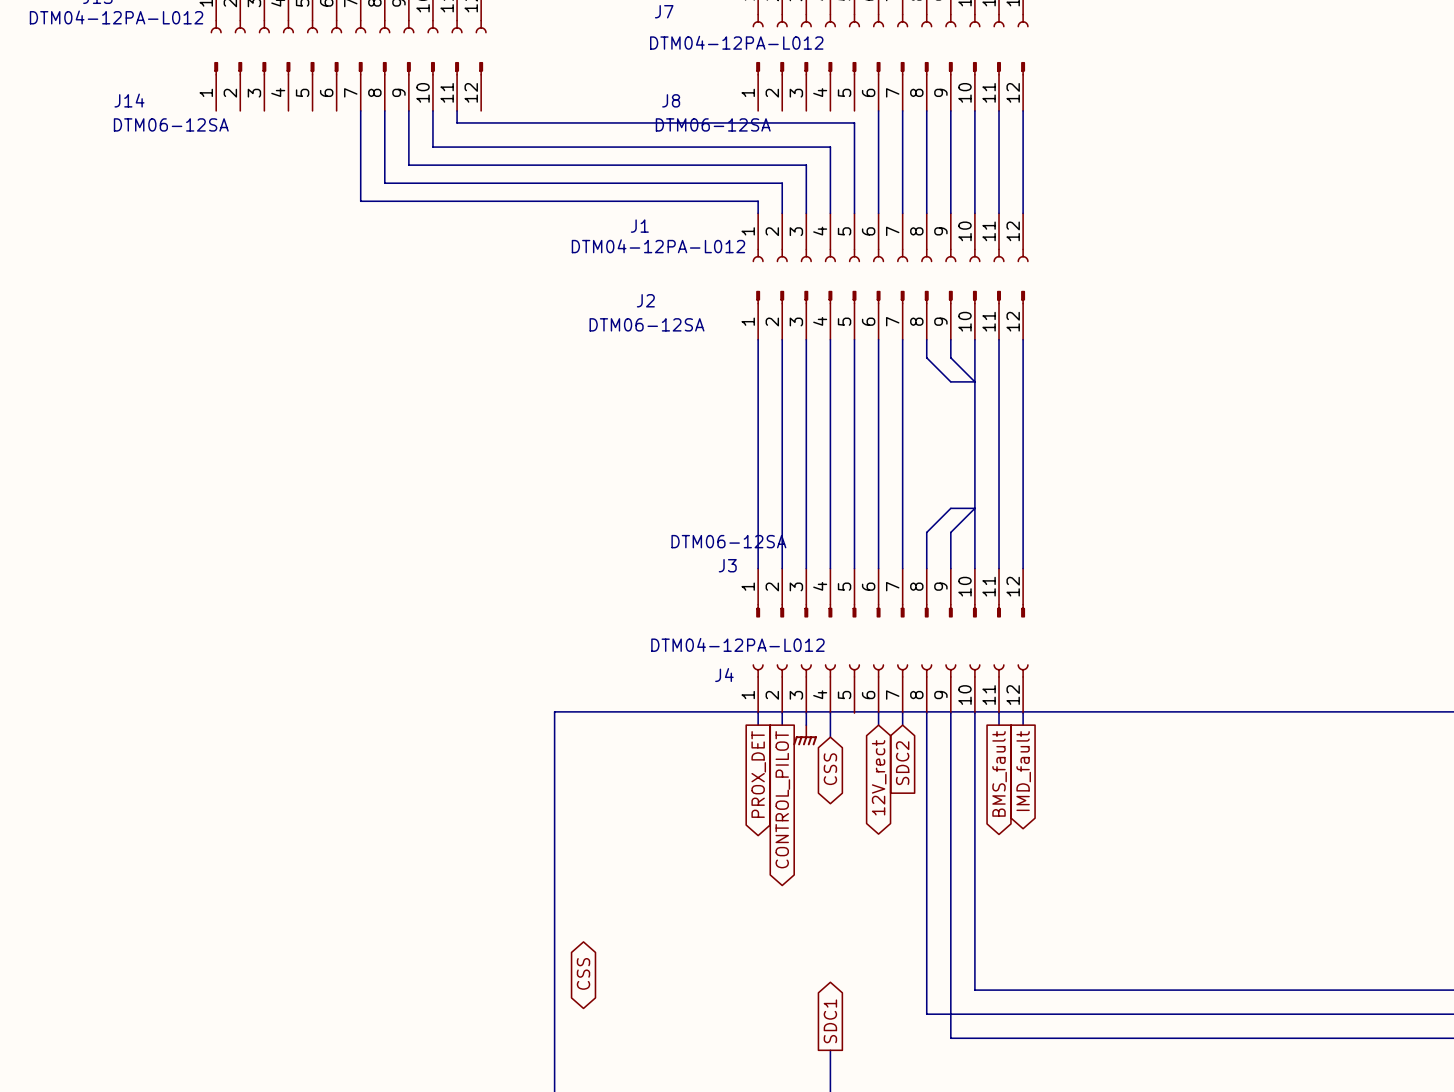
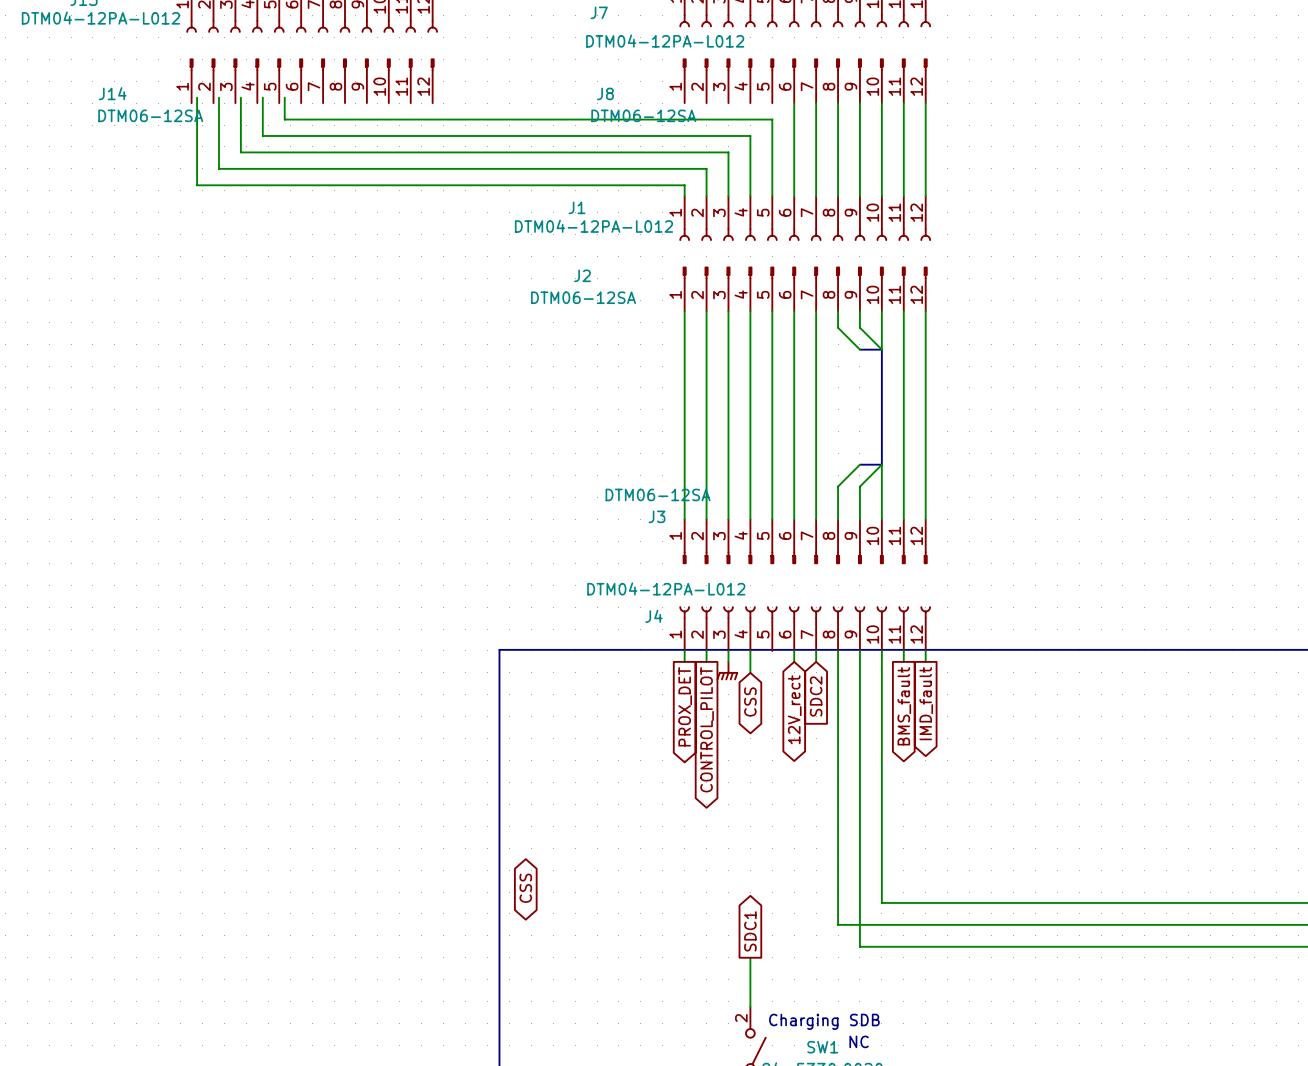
wire: (360, 110) (360, 201) -> (197, 97) (197, 185) (323, 185)
wire: (384, 110) (384, 183) -> (218, 97) (218, 168) (344, 168)
wire: (408, 110) (408, 165) -> (240, 97) (240, 152) (366, 152)
wire: (432, 110) (432, 147) -> (262, 97) (262, 135) (388, 135)
wire: (457, 110) (457, 122) (854, 122) (854, 129) -> (284, 97) (284, 119) (772, 119)

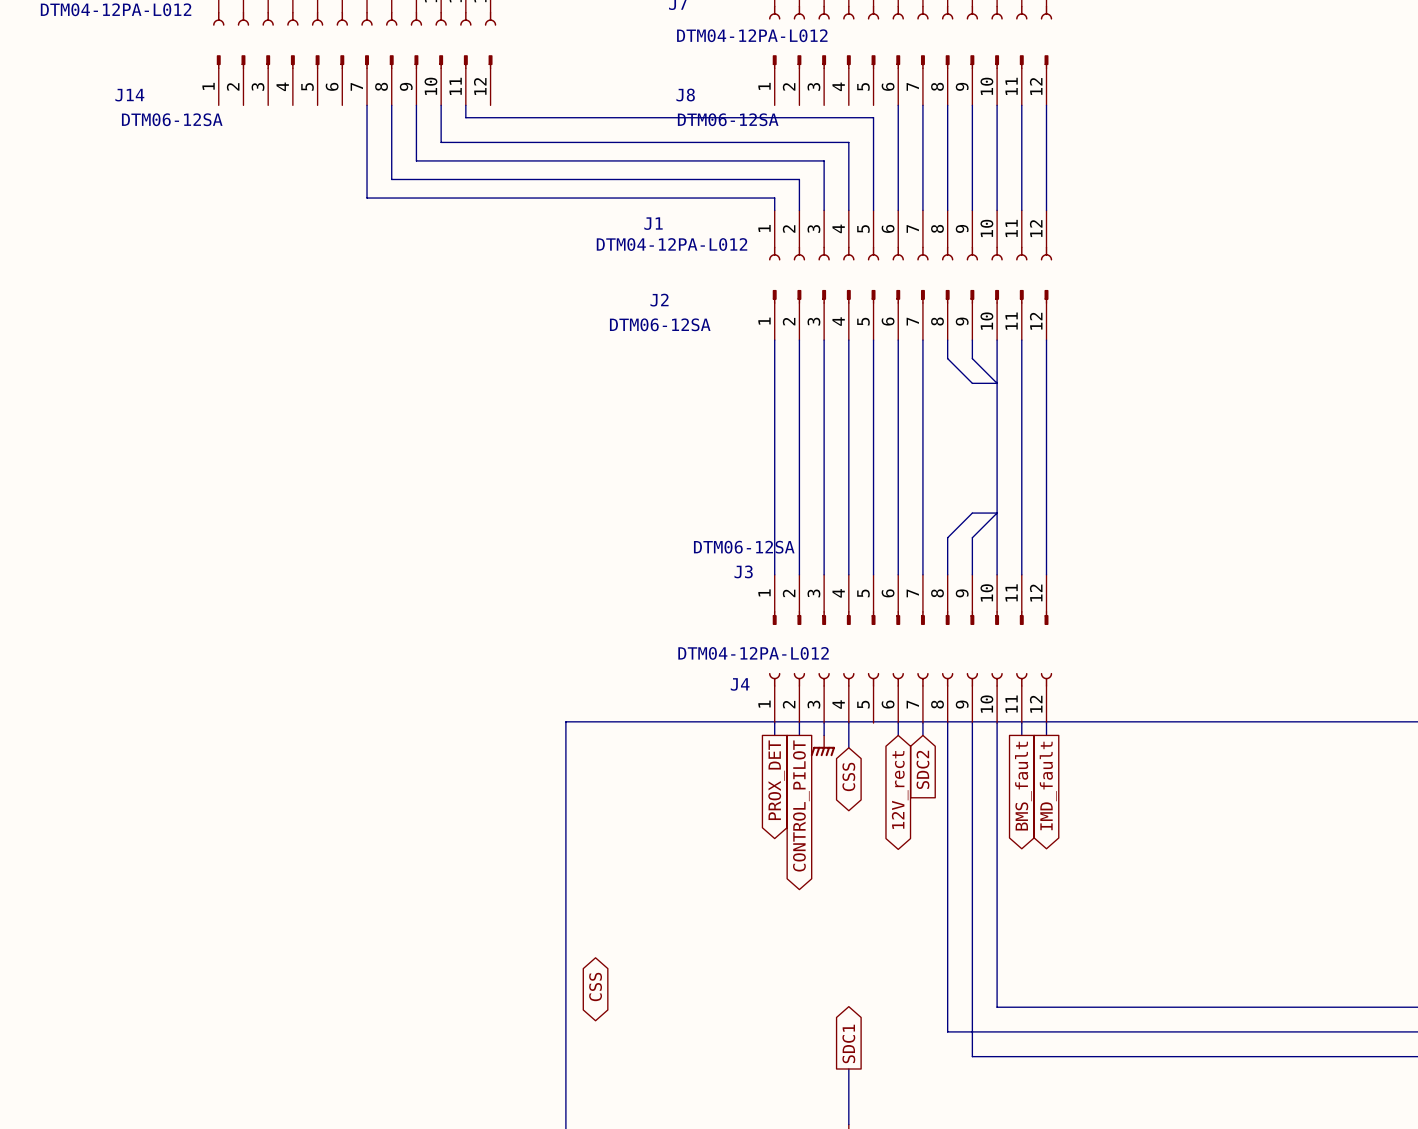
wire: (197, 97) (197, 185) (323, 185) -> (367, 105) (367, 198)
wire: (218, 97) (218, 168) (344, 168) -> (391, 105) (391, 179)
wire: (240, 97) (240, 152) (366, 152) -> (416, 105) (416, 160)
wire: (262, 97) (262, 135) (388, 135) -> (441, 105) (441, 142)
wire: (284, 97) (284, 119) (772, 119) -> (465, 105) (465, 117) (873, 117) (873, 123)

